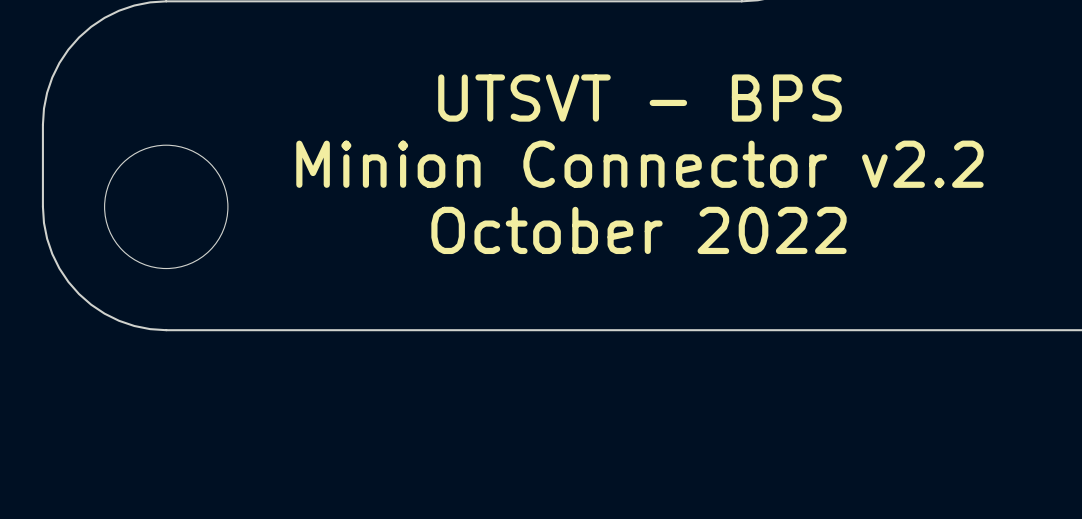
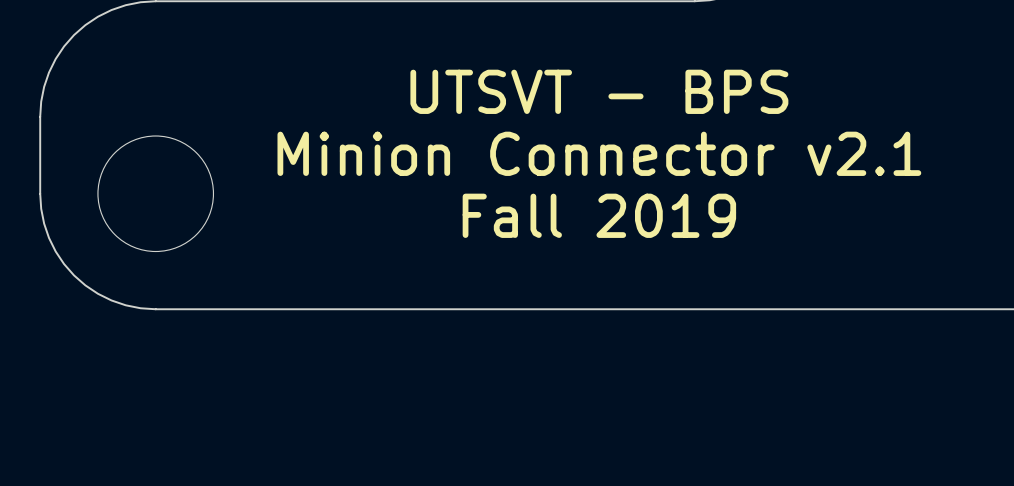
text: Minion Connector v2.2 (639, 164) -> Minion Connector v2.1 (599, 153)
text: October 2022 (639, 230) -> Fall 2019 (599, 215)

